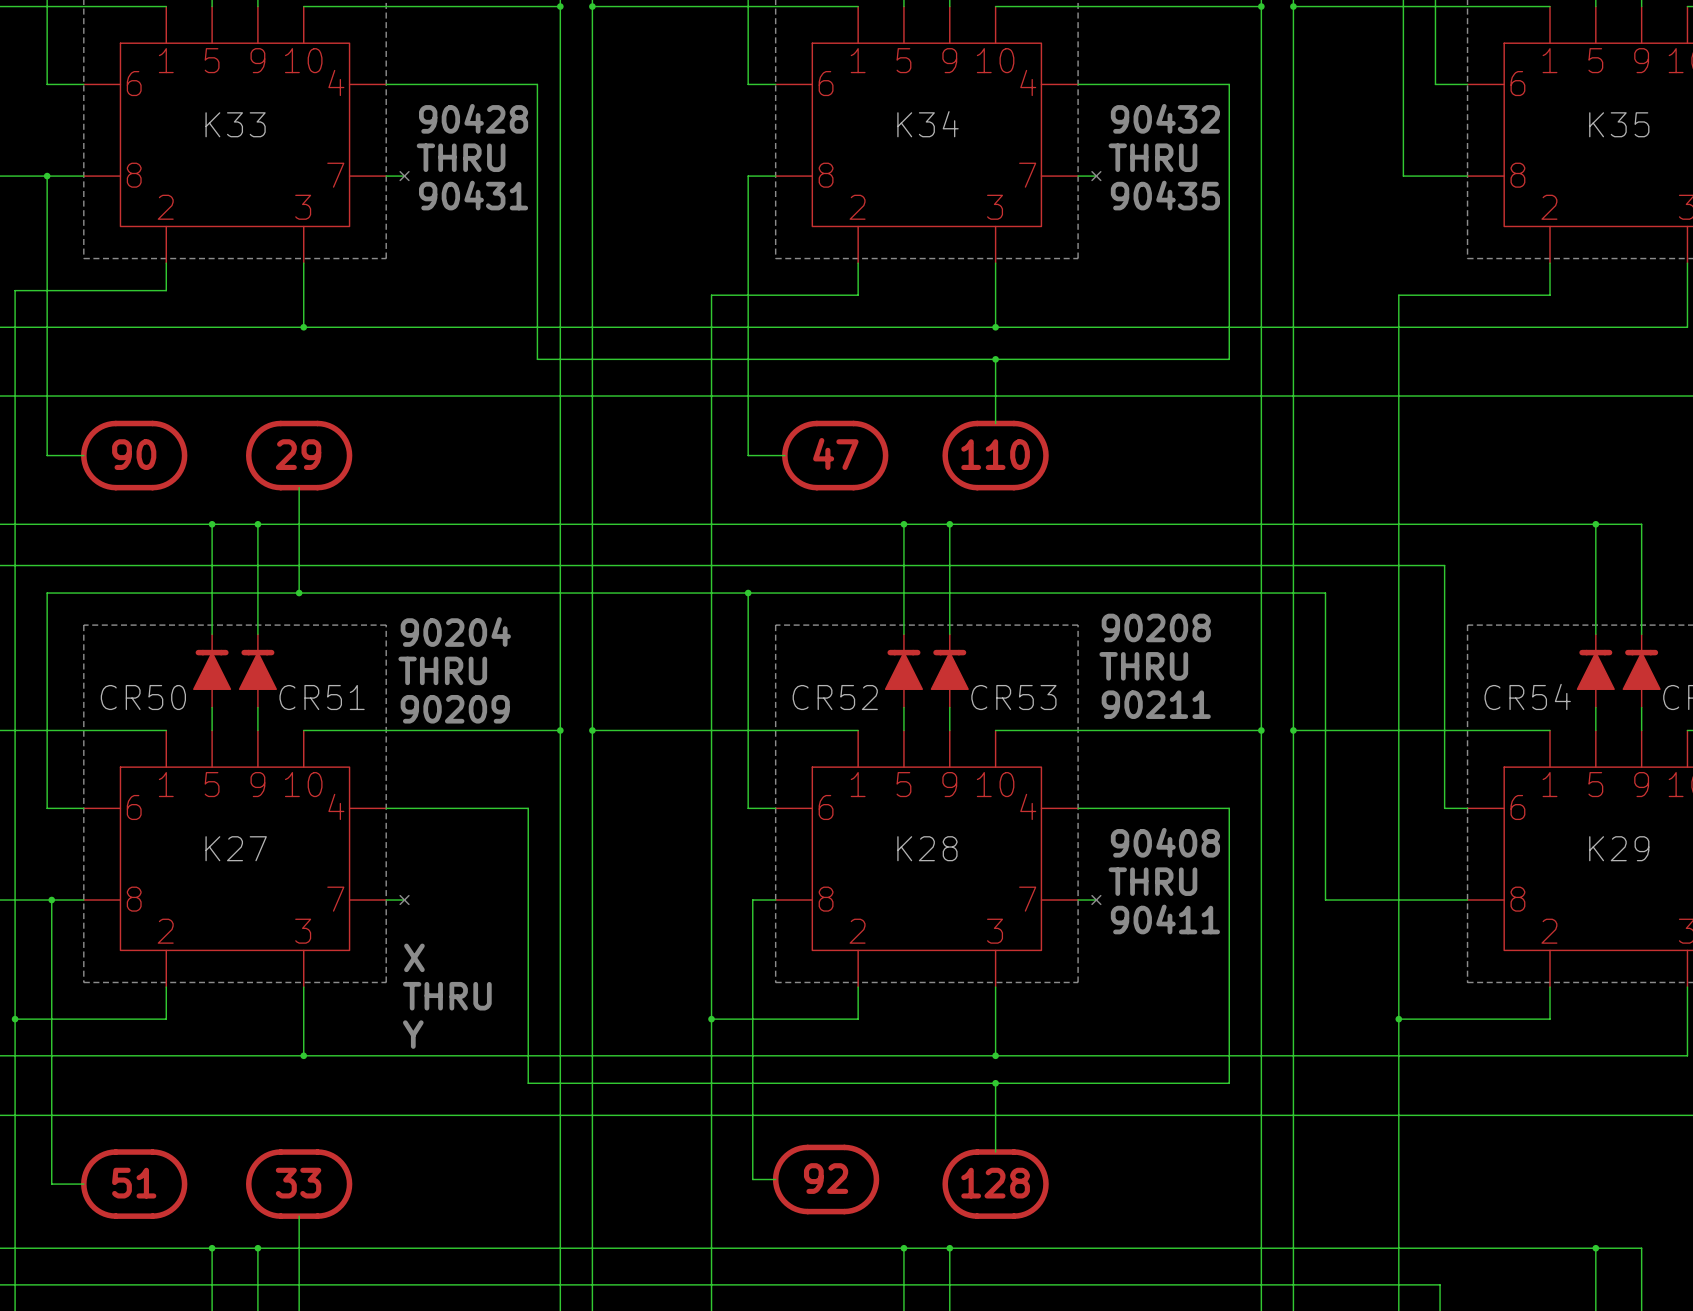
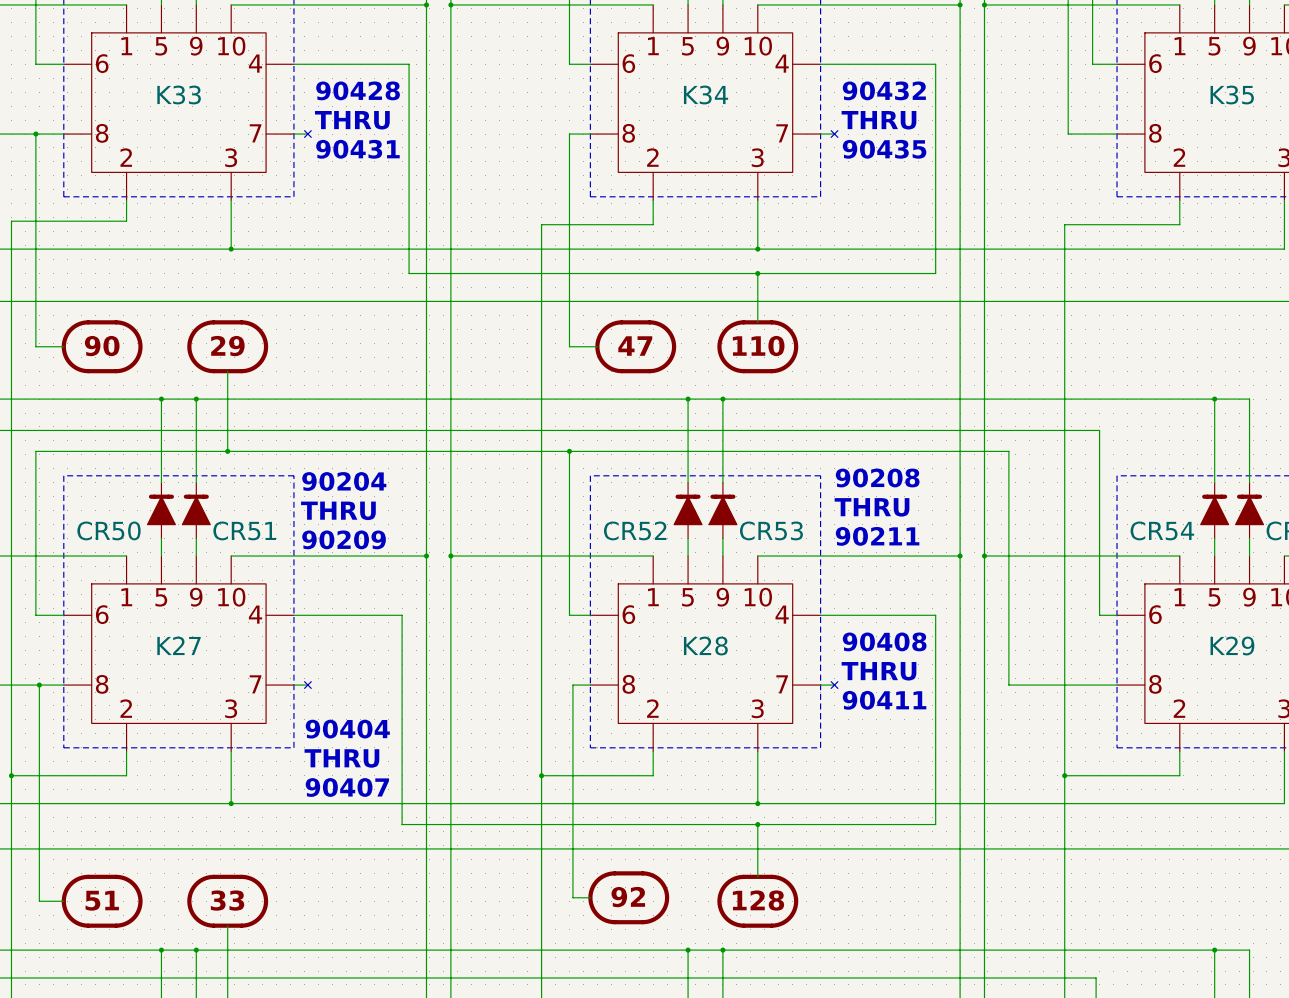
text: X (414, 957) -> 90404 (347, 729)
text: Y (413, 1034) -> 90407 (347, 787)

